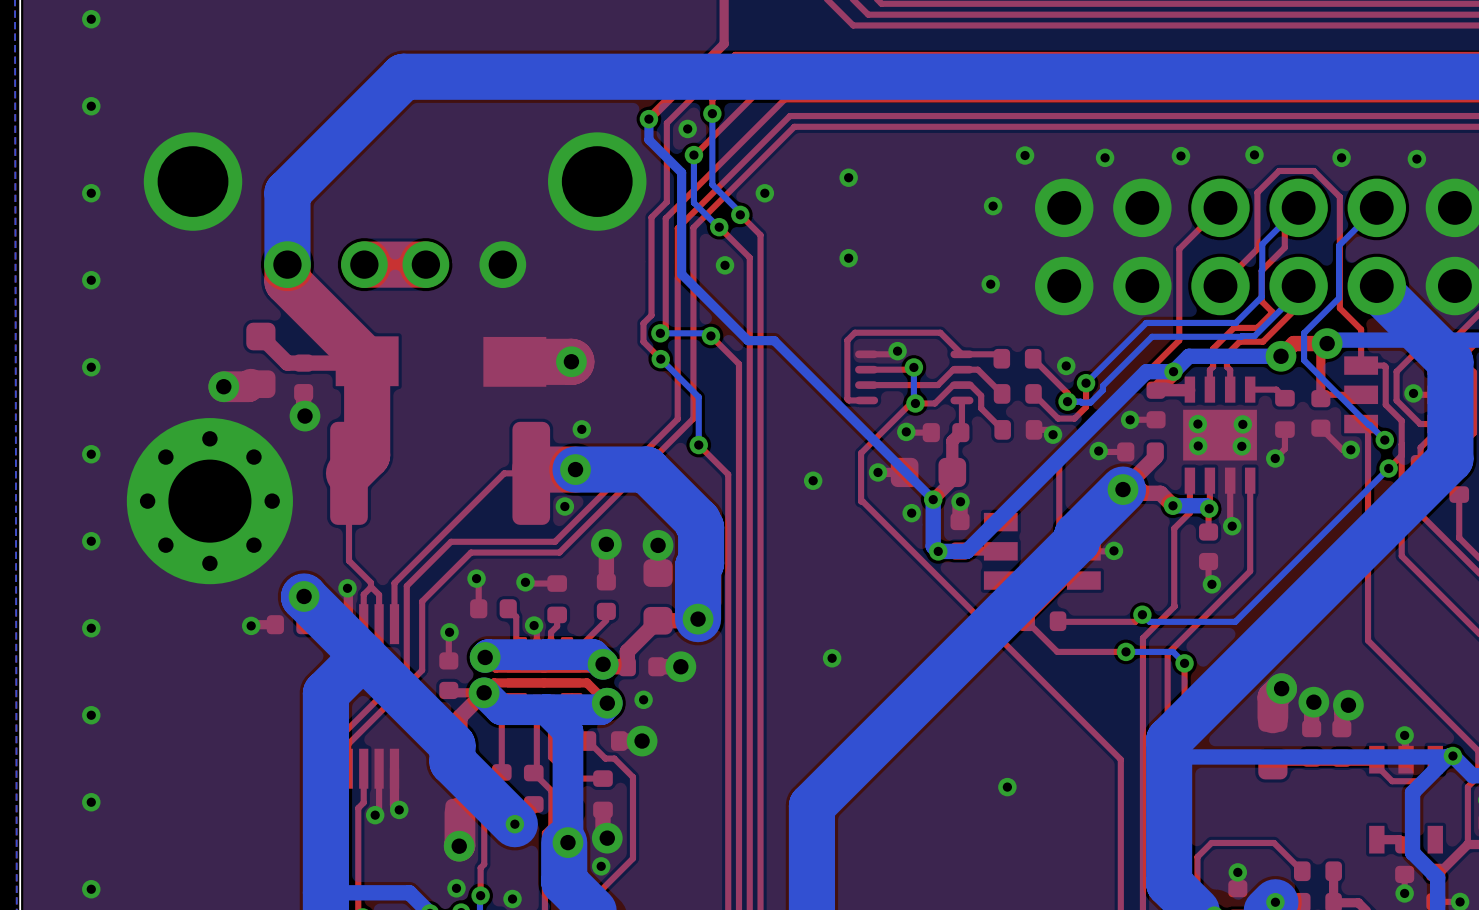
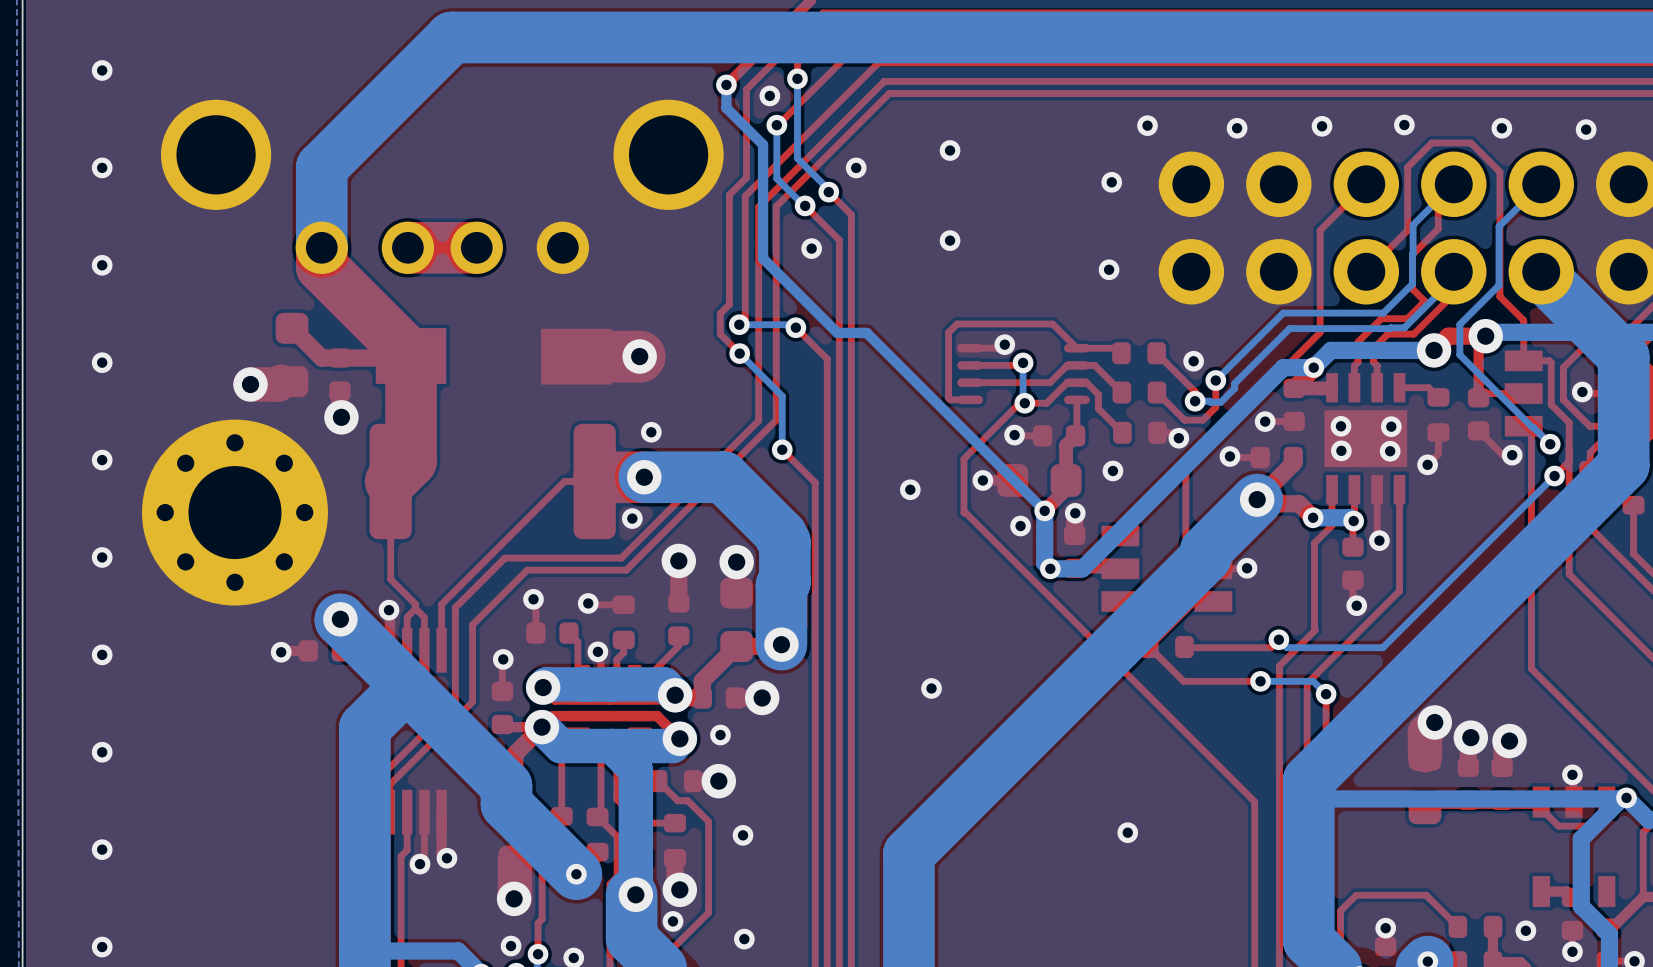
via: none -> (1112, 470)
via: none -> (743, 835)
via: none -> (1525, 930)
via: none -> (744, 939)

